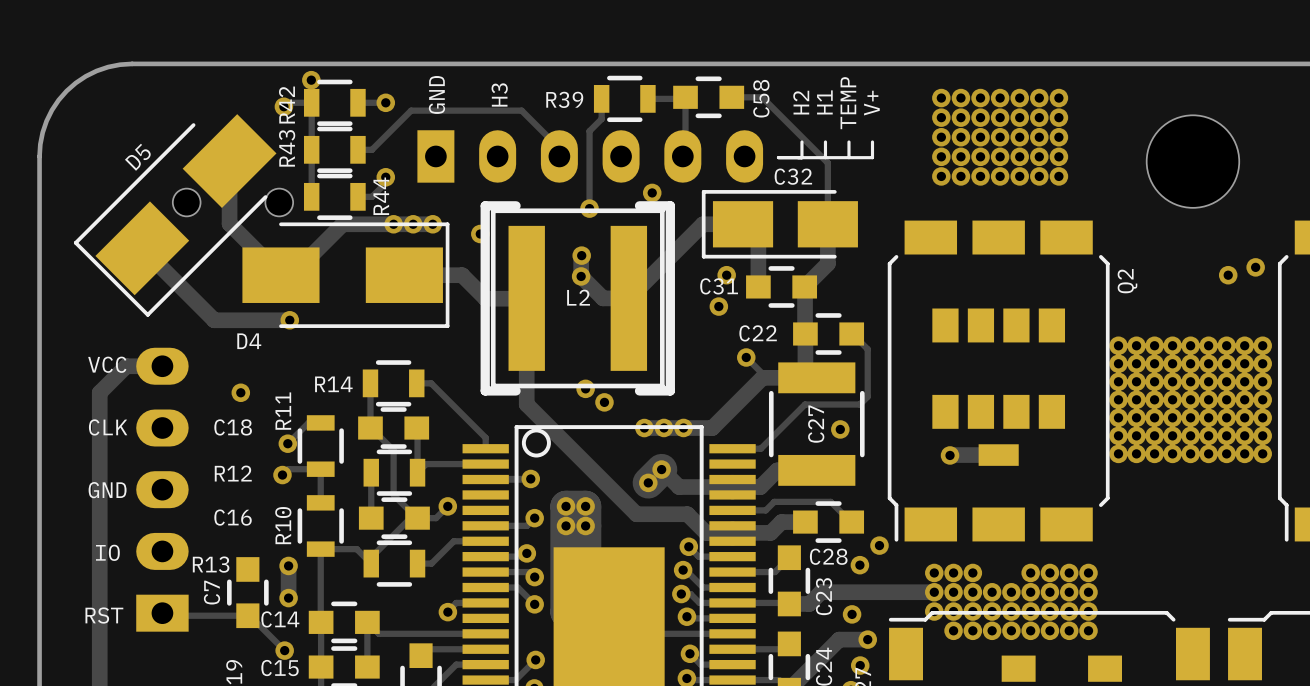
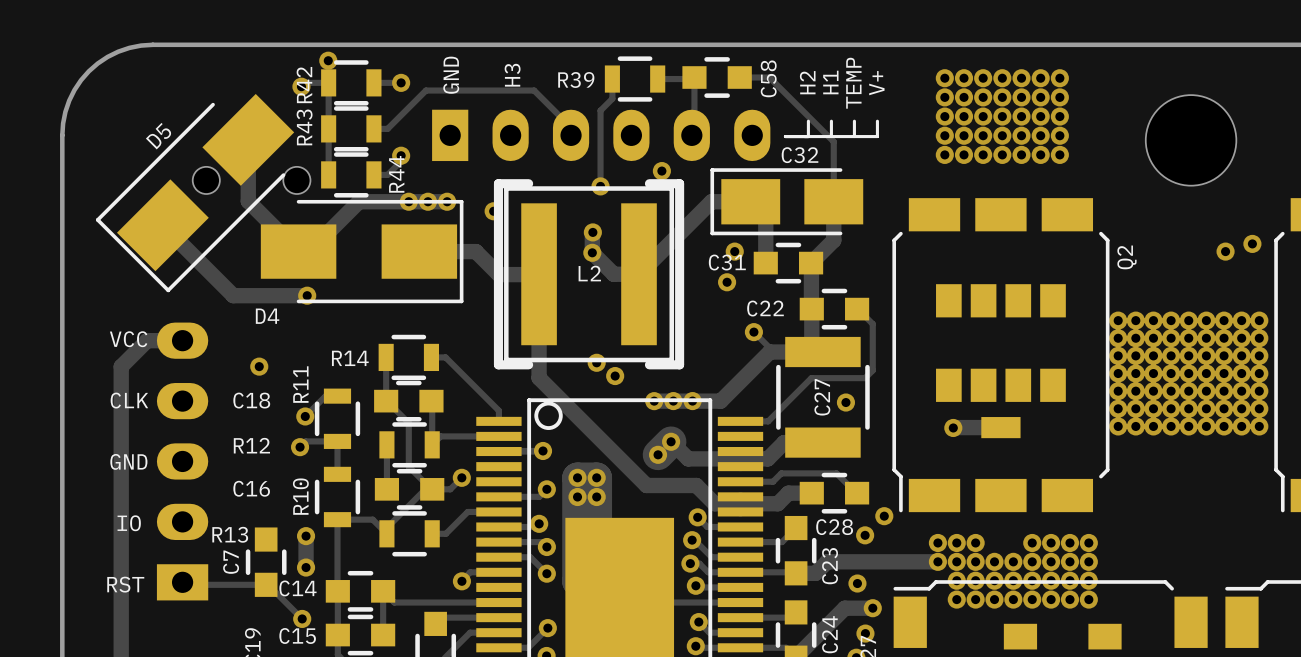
via: (934, 611) -> none

